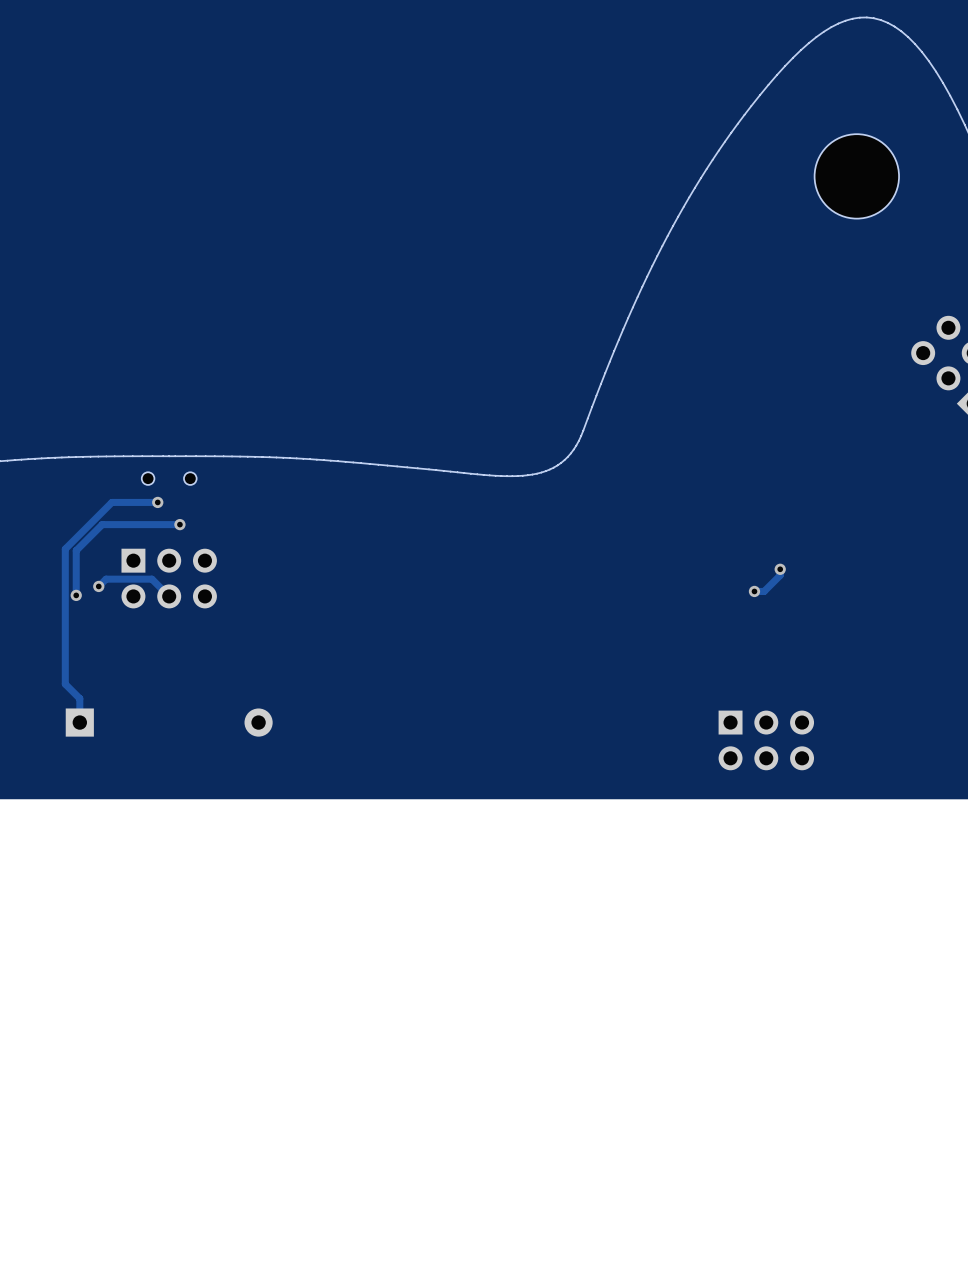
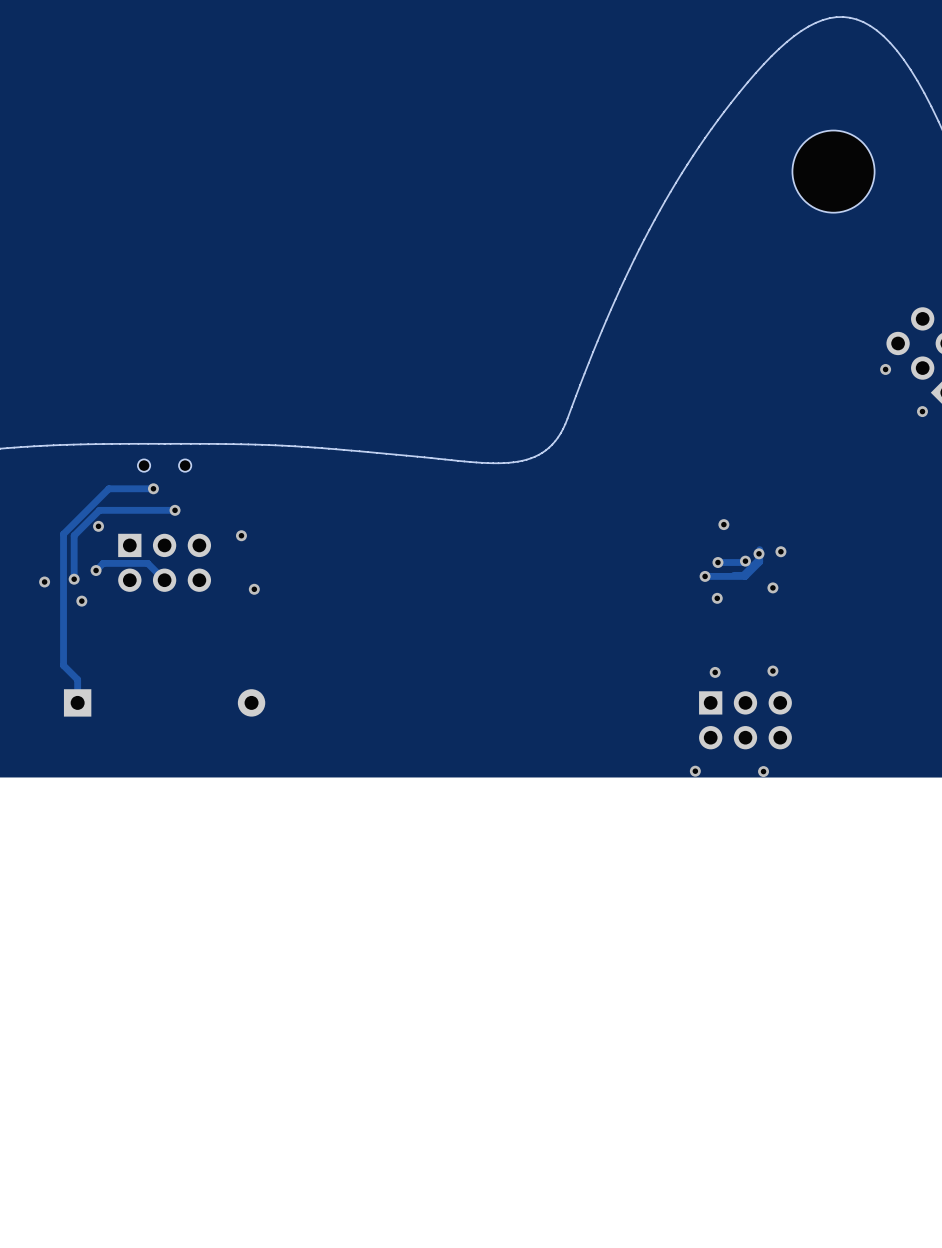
via: none -> (885, 369)
via: none -> (922, 411)
via: none -> (723, 524)
via: none -> (98, 526)
via: none -> (241, 535)
track: none -> (759, 549) (759, 561) (745, 576) (705, 576)
via: none -> (780, 551)
track: none -> (745, 561) (717, 562)
via: none -> (745, 561)
via: none -> (717, 562)
via: (754, 591) -> none
via: none -> (705, 576)
via: none -> (44, 581)
via: none -> (772, 587)
via: none -> (254, 589)
via: none -> (717, 598)
via: none -> (81, 601)
via: none -> (772, 671)
via: none -> (715, 672)
via: none -> (695, 771)
via: none -> (763, 771)

